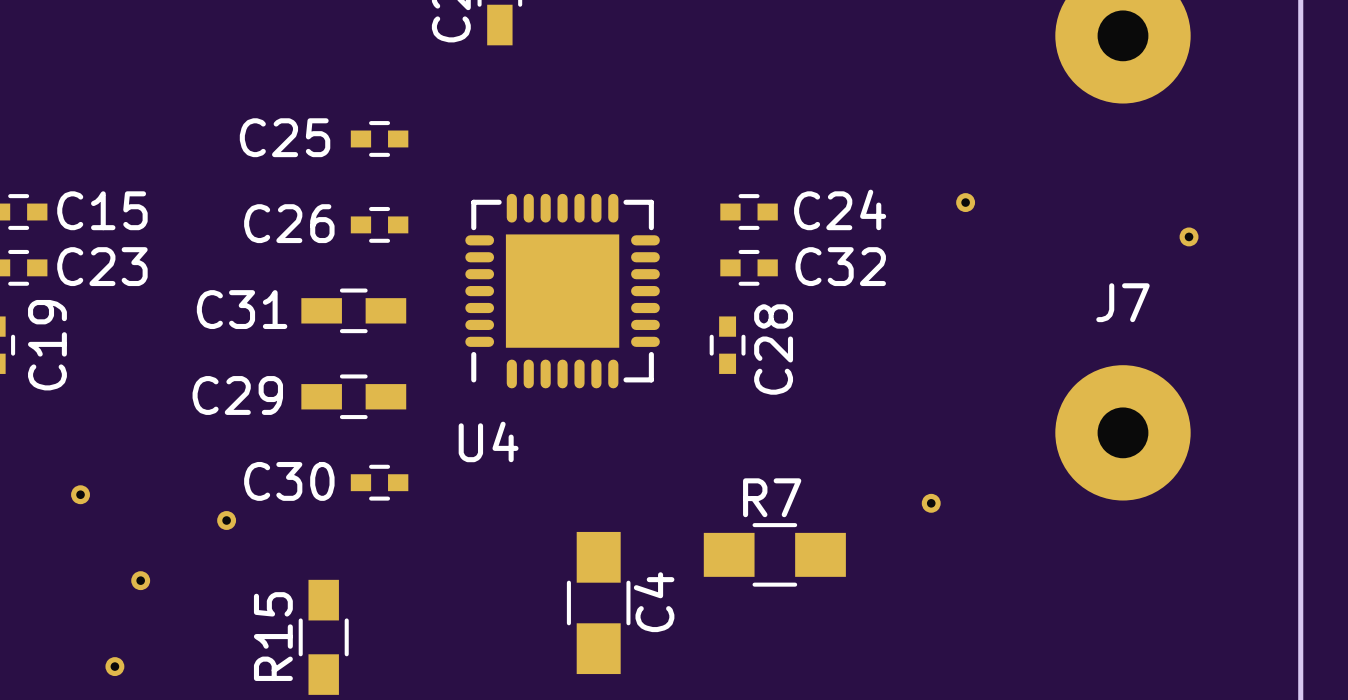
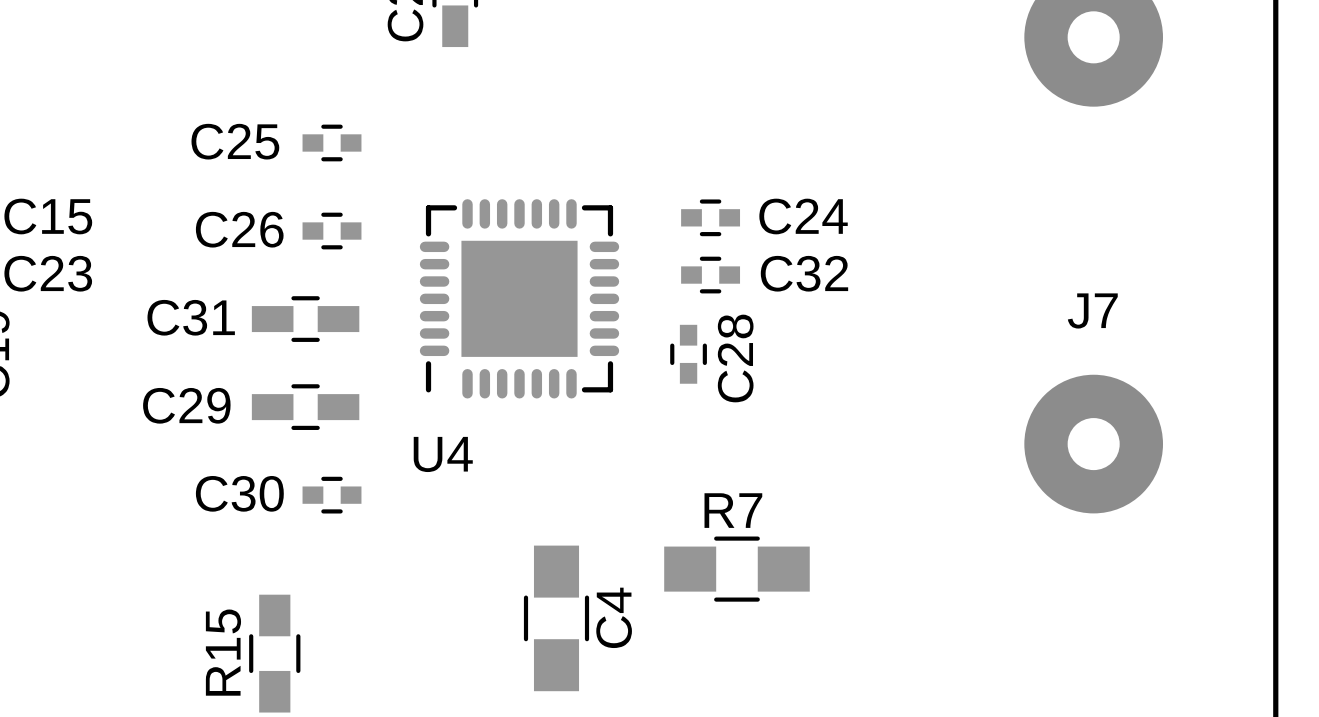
part: (965, 202) -> none
part: (1189, 236) -> none
part: (80, 494) -> none
part: (931, 503) -> none
part: (226, 520) -> none
part: (140, 580) -> none
part: (114, 666) -> none

